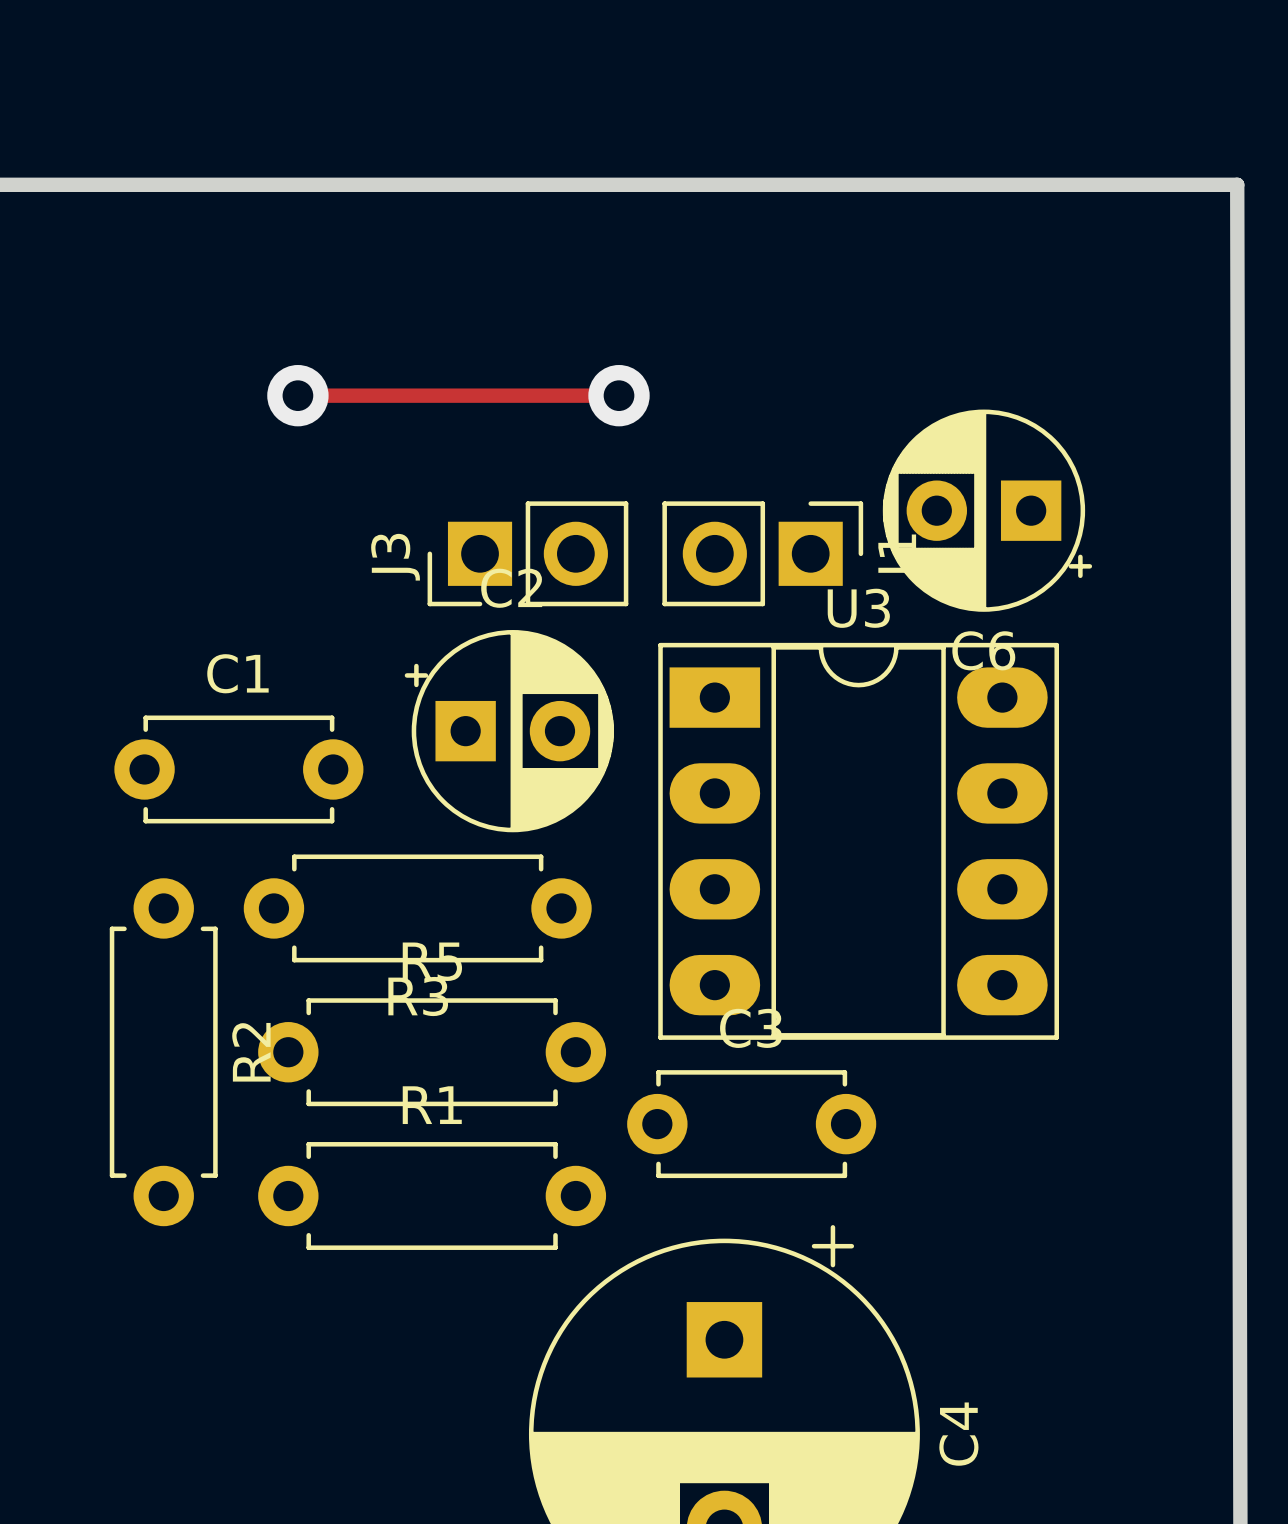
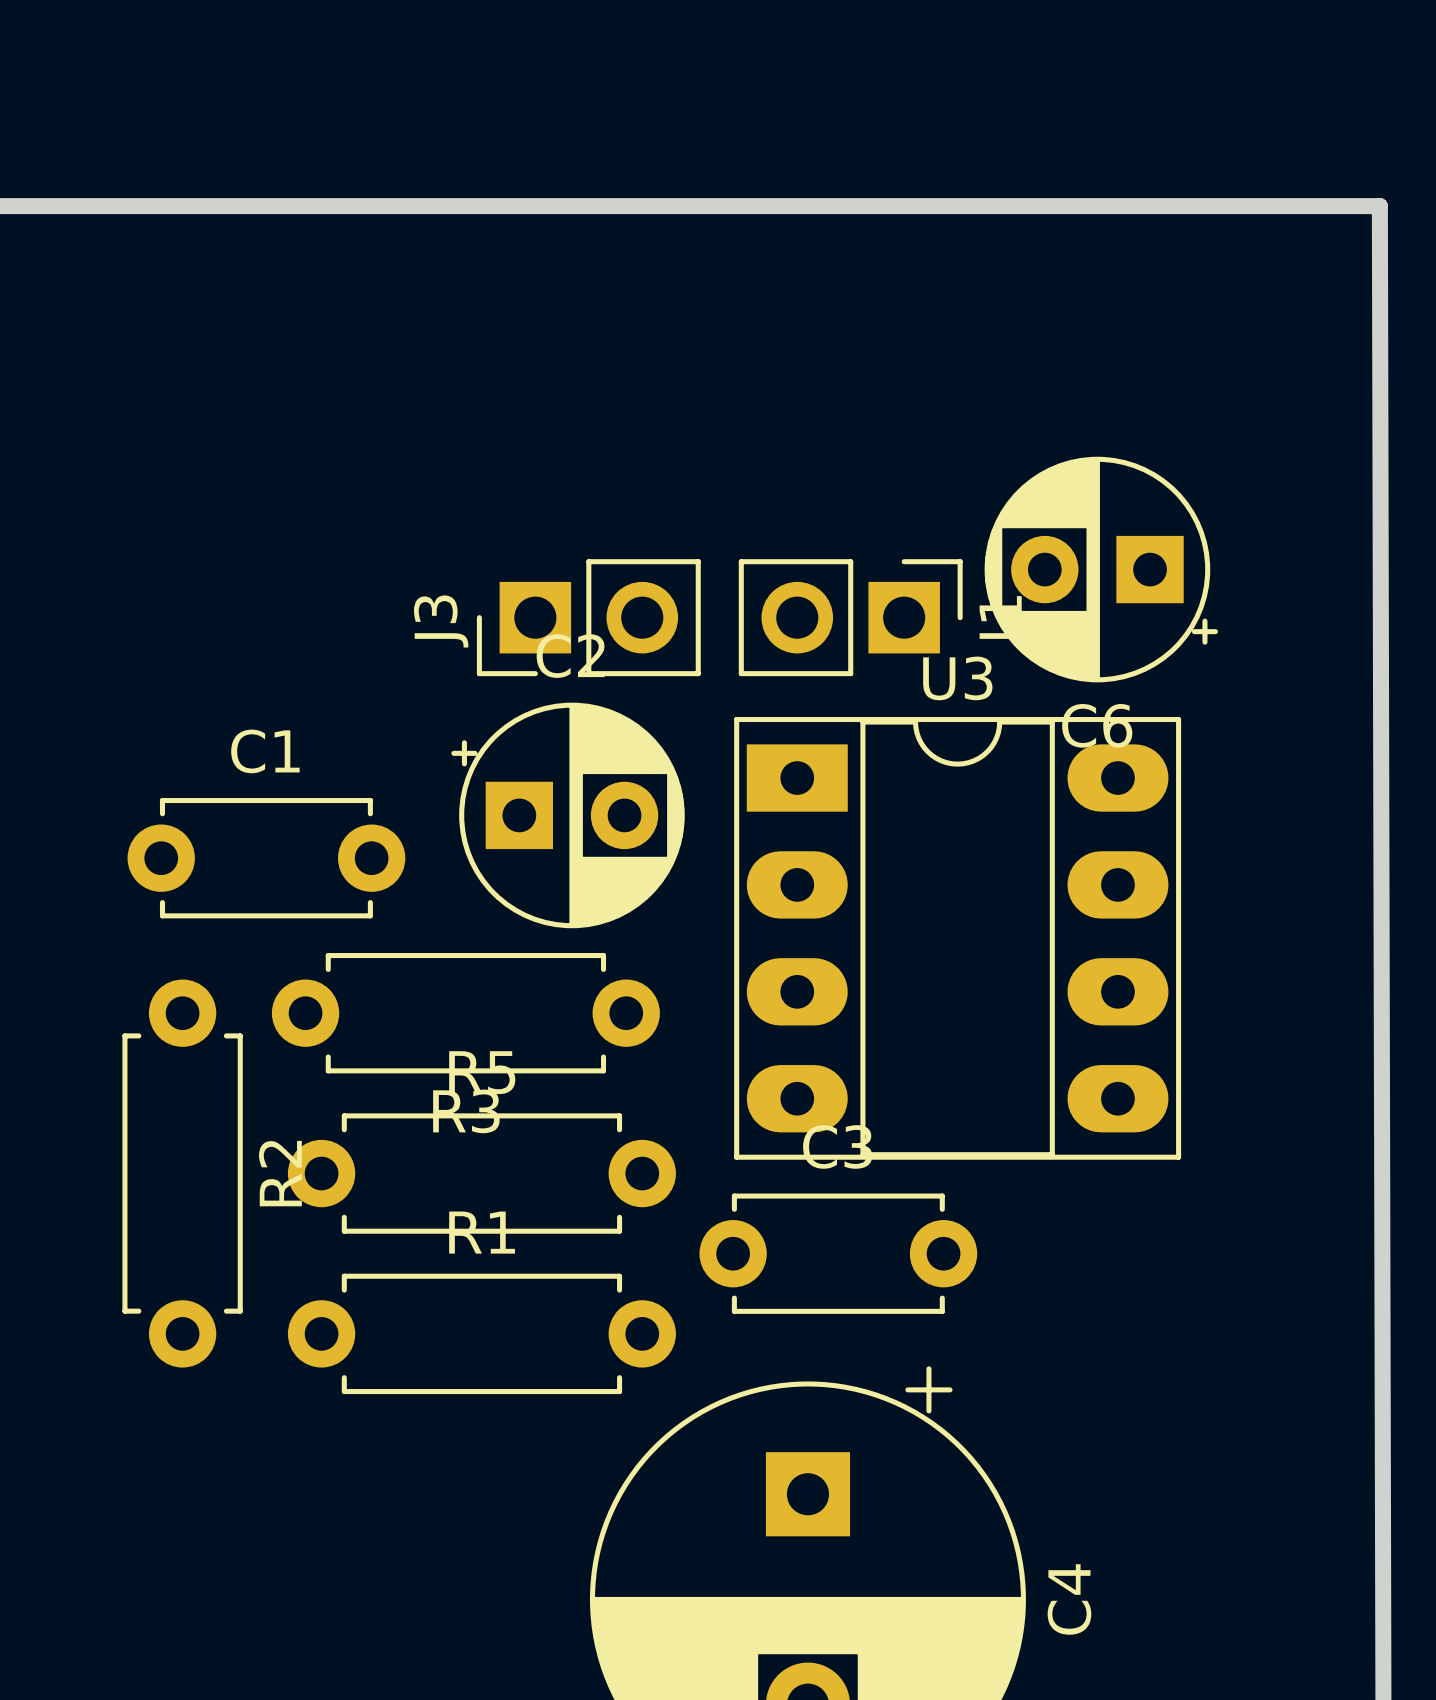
track: (297, 395) (619, 395) -> none
via: (297, 395) -> none
via: (619, 395) -> none

